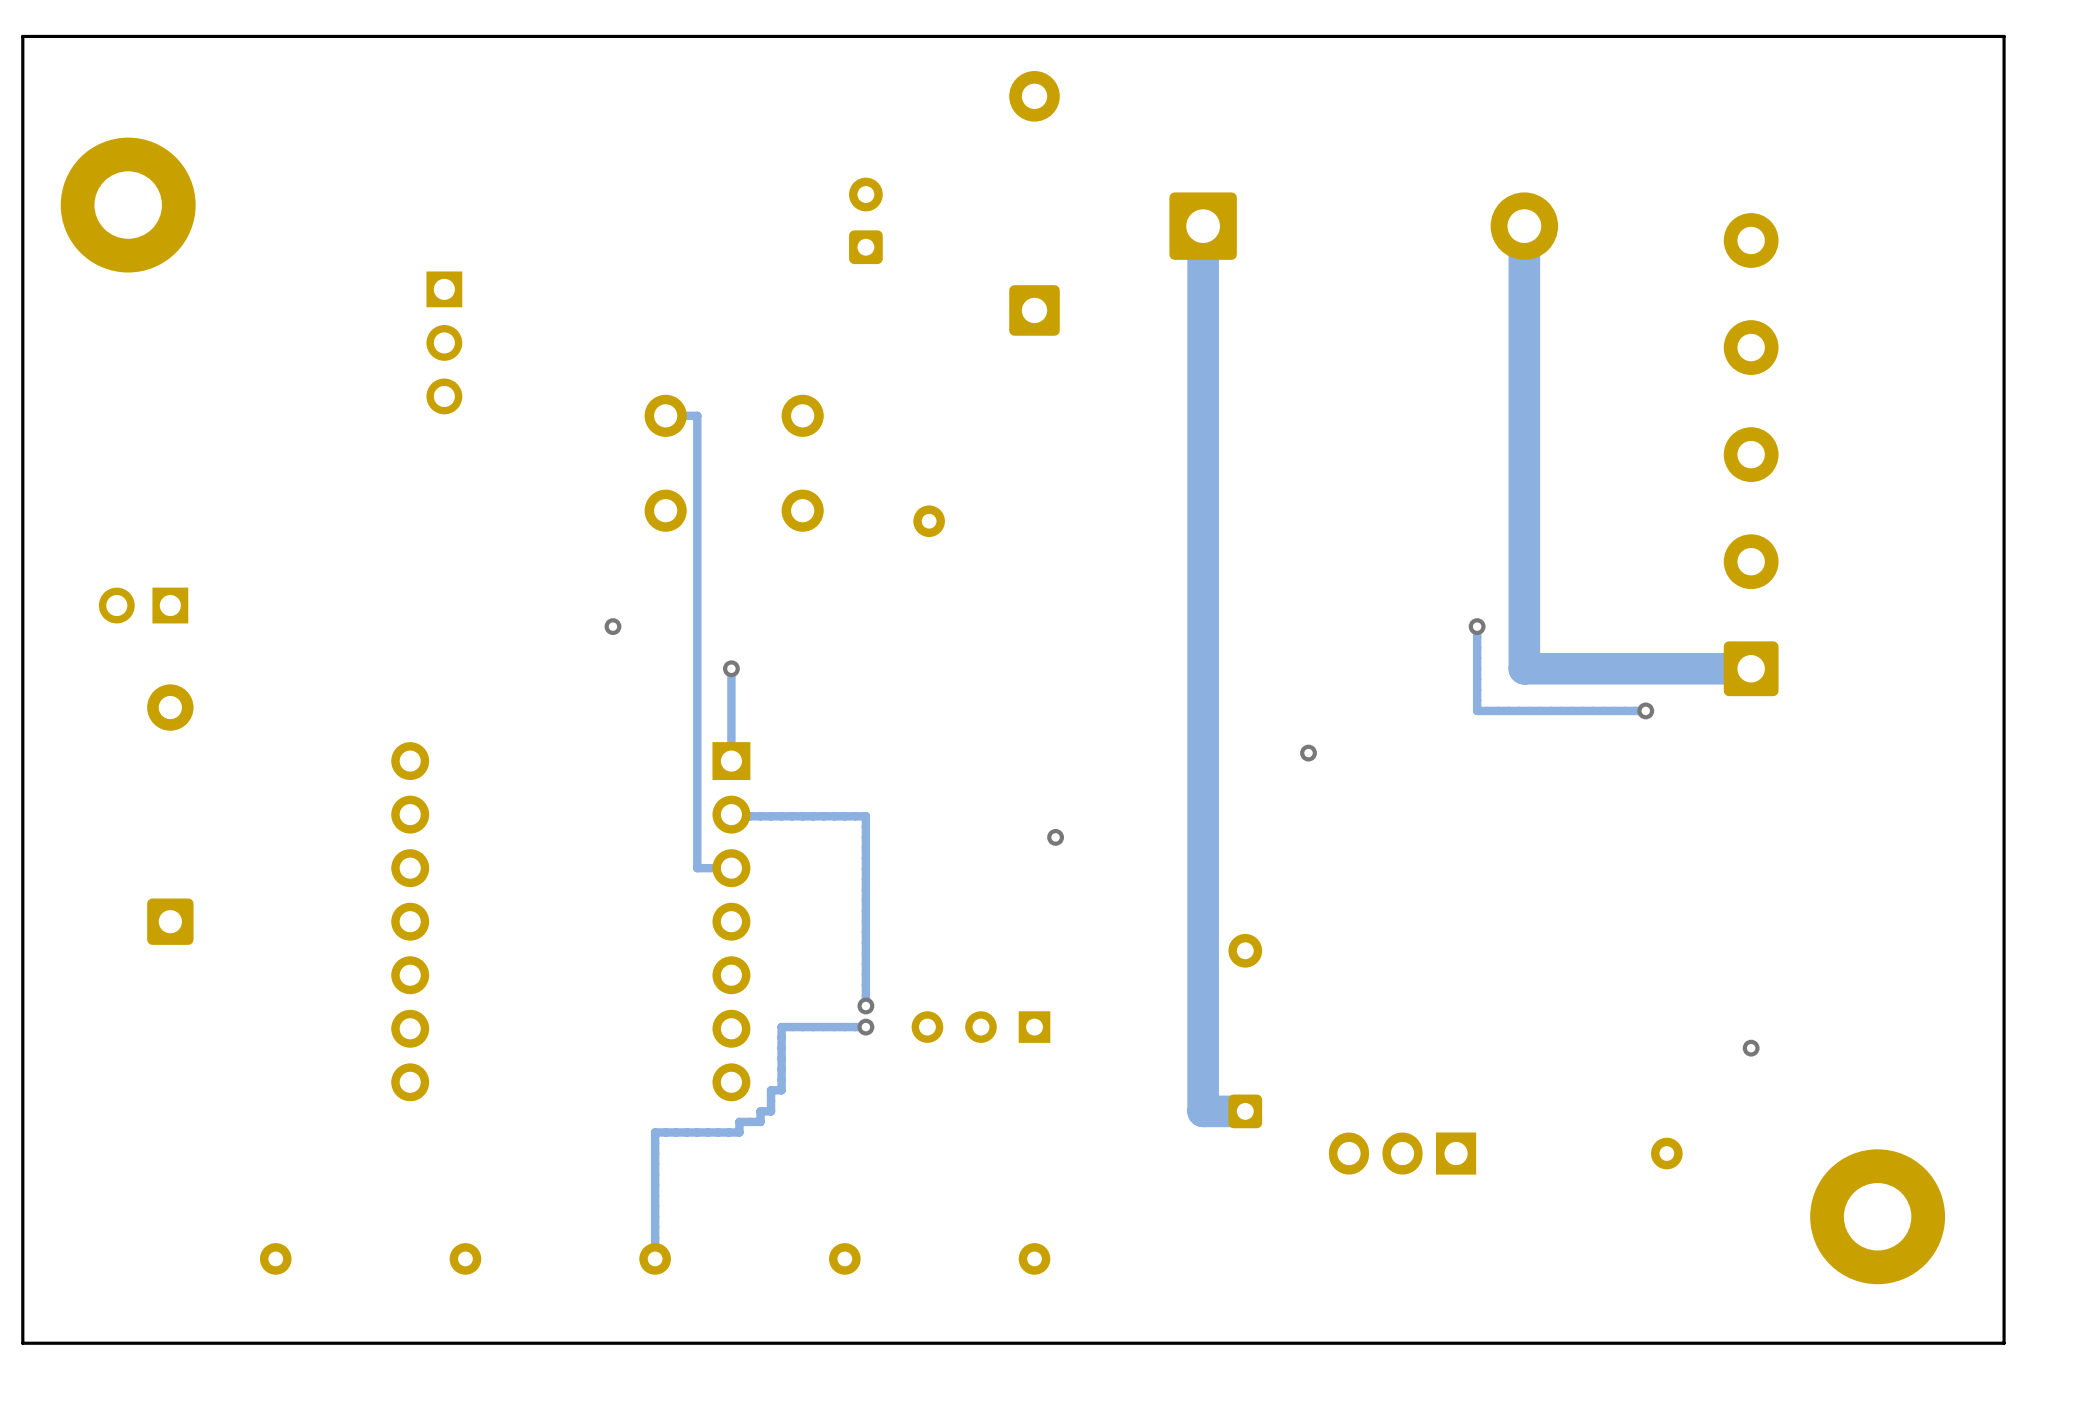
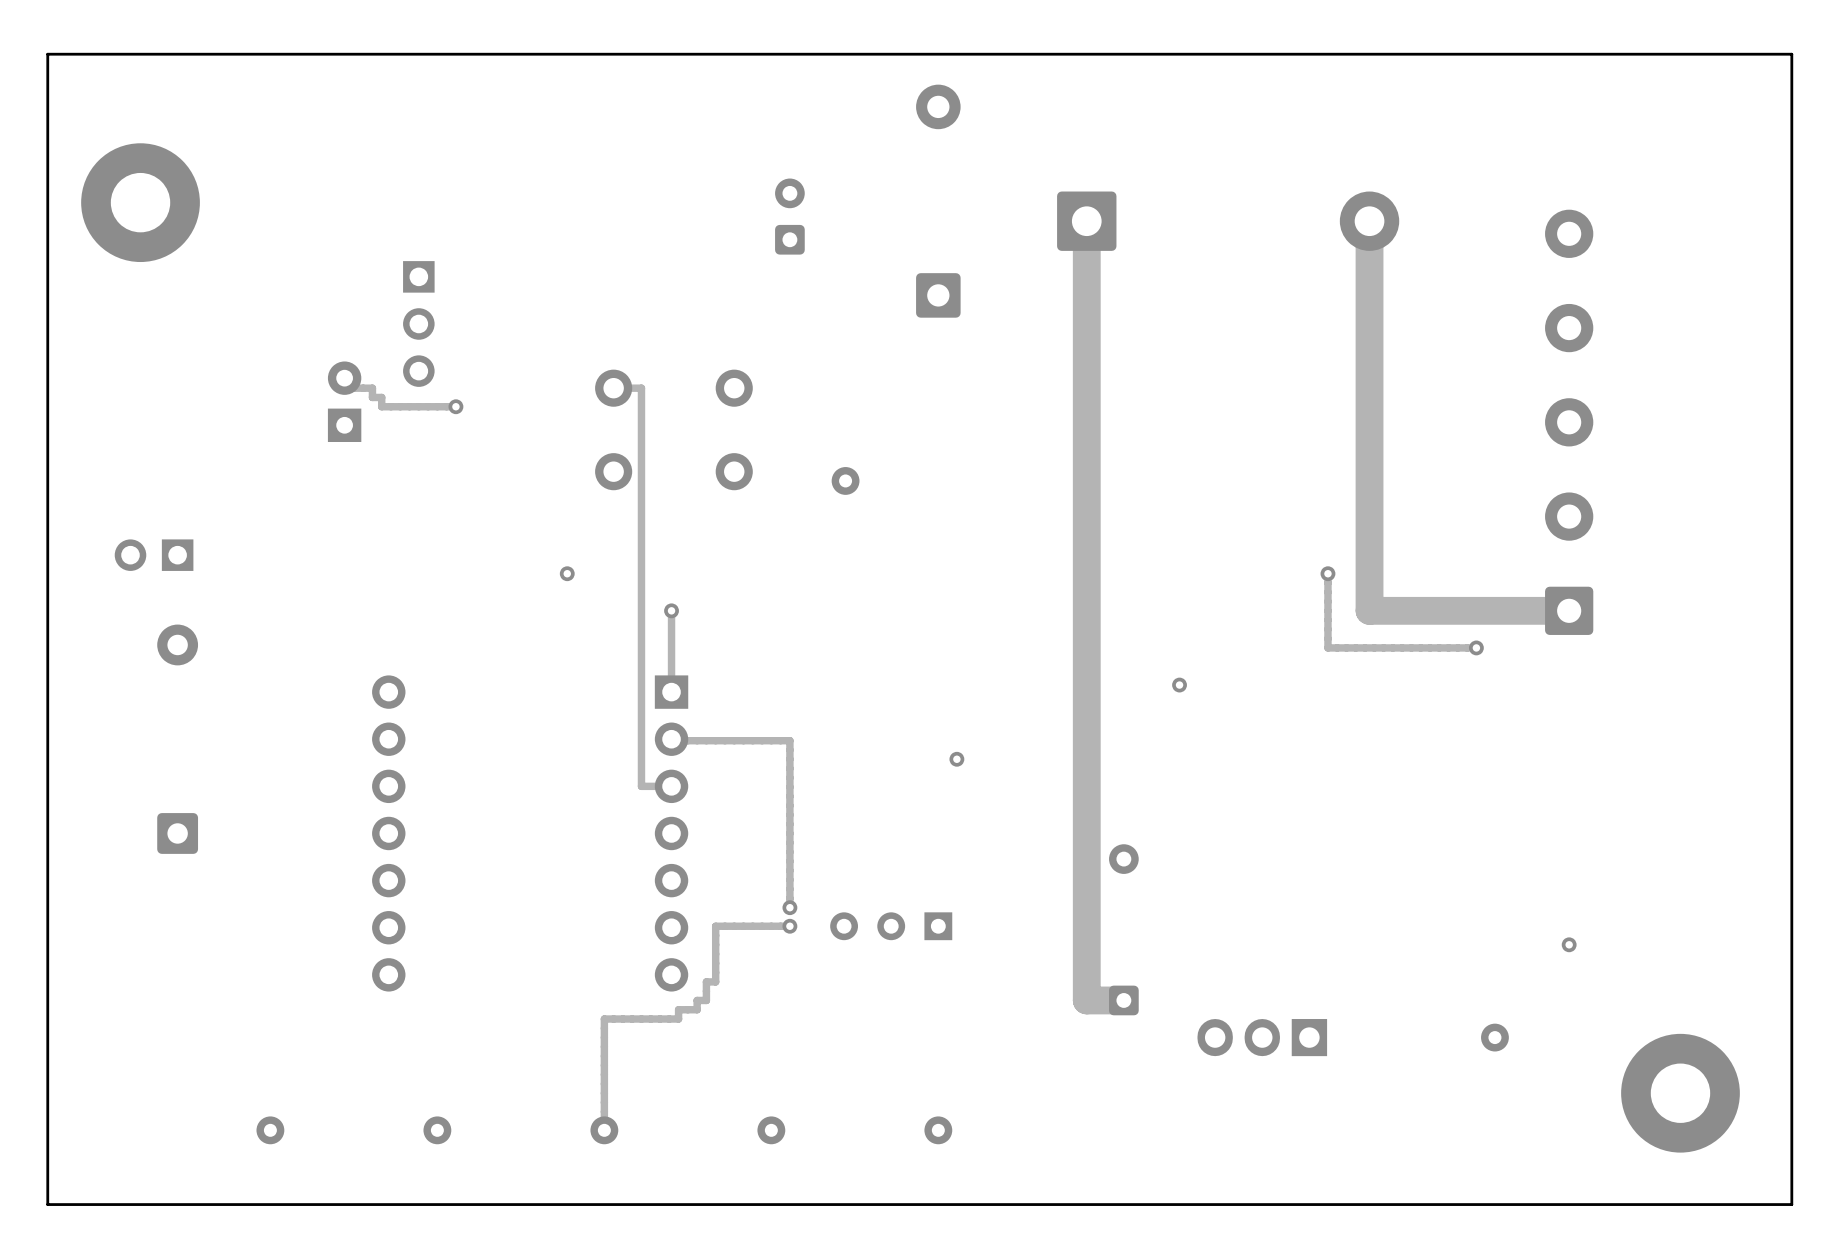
track: none -> (344, 378) (344, 388) (372, 388) (372, 397) (381, 397) (381, 406) (455, 406)
part: none -> (344, 401)
via: none -> (455, 406)

